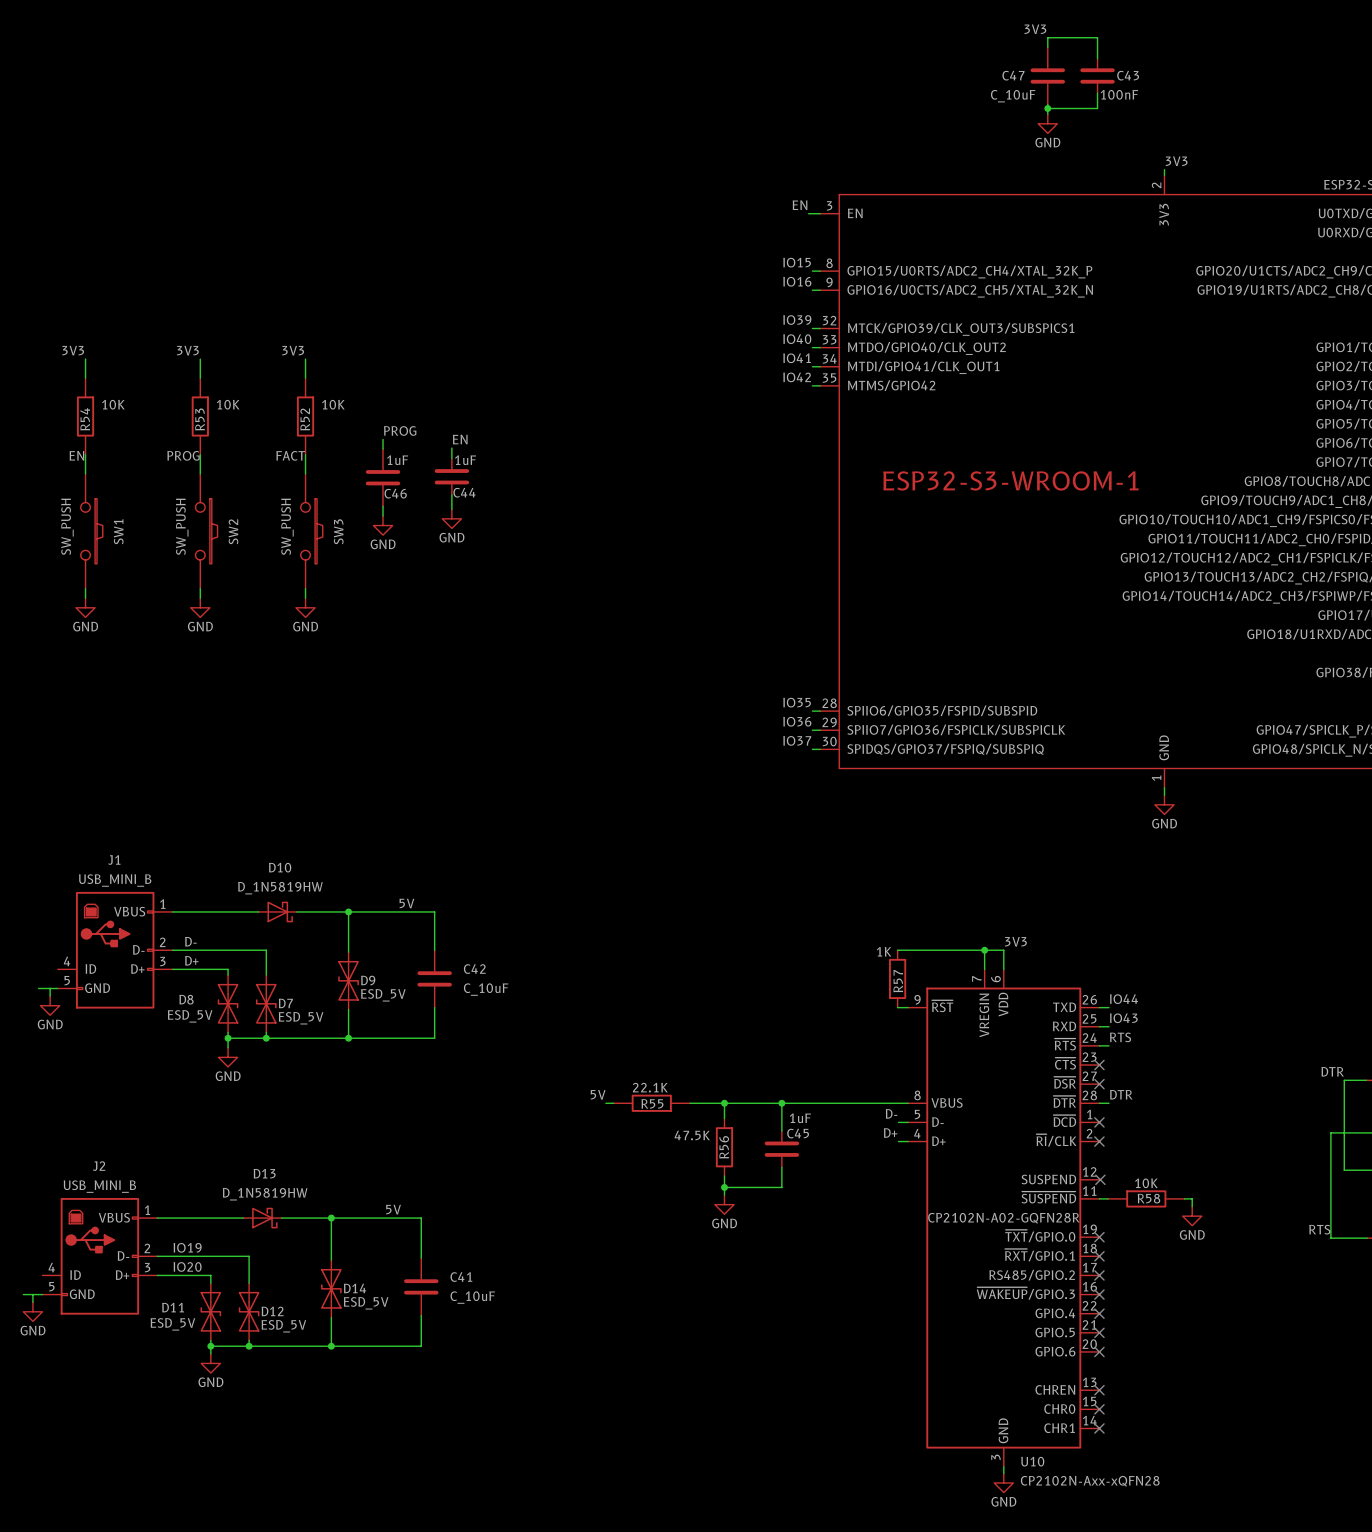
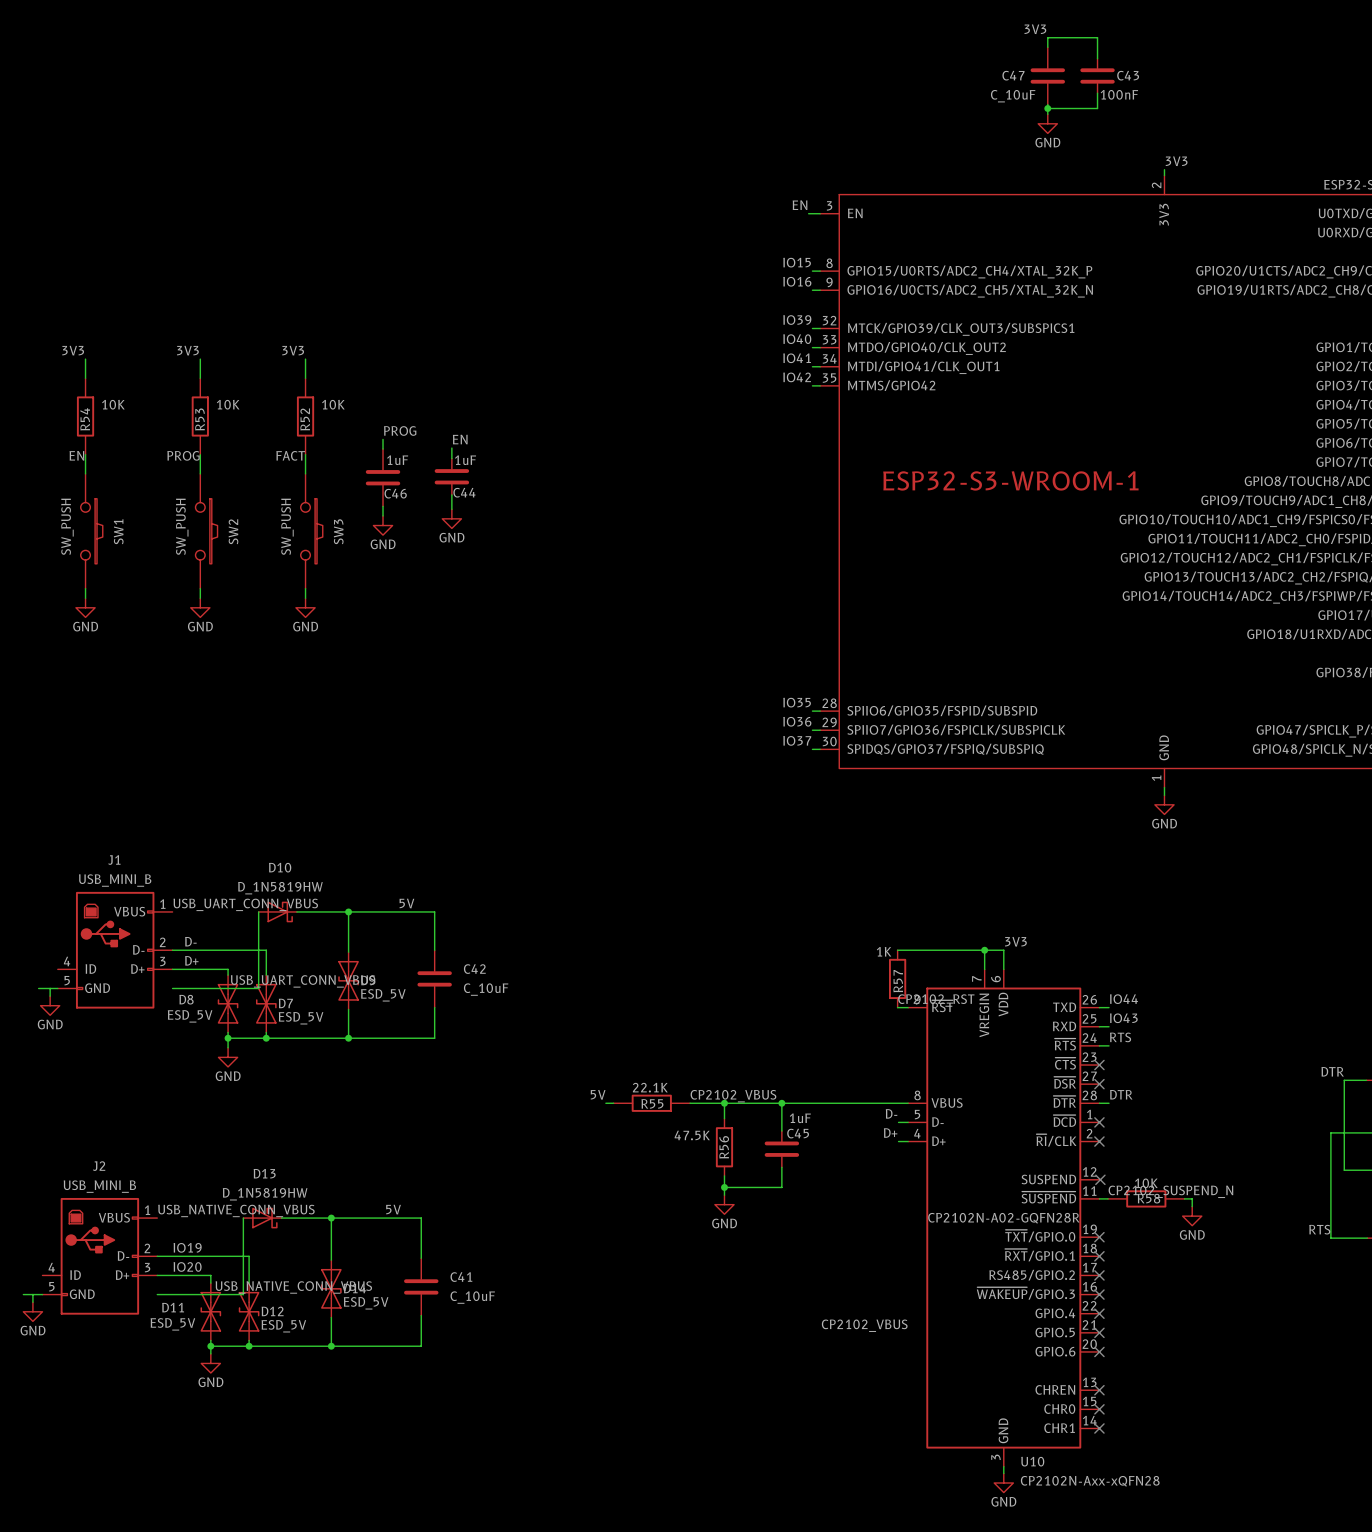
label: none -> USB_UART_CONN_VBUS (245, 904)
wire: (172, 911) (258, 911) -> (172, 988) (258, 988) (258, 911)
label: none -> USB_UART_CONN_VBUS (303, 981)
label: none -> CP2102_RST (936, 1000)
label: none -> CP2102_VBUS (733, 1096)
label: none -> CP2102_SUSPEND_N (1170, 1191)
label: none -> USB_NATIVE_CONN_VBUS (236, 1210)
wire: (157, 1218) (243, 1218) -> (157, 1294) (243, 1294) (243, 1218)
label: none -> USB_NATIVE_CONN_VBUS (293, 1287)
label: none -> CP2102_VBUS (864, 1325)

